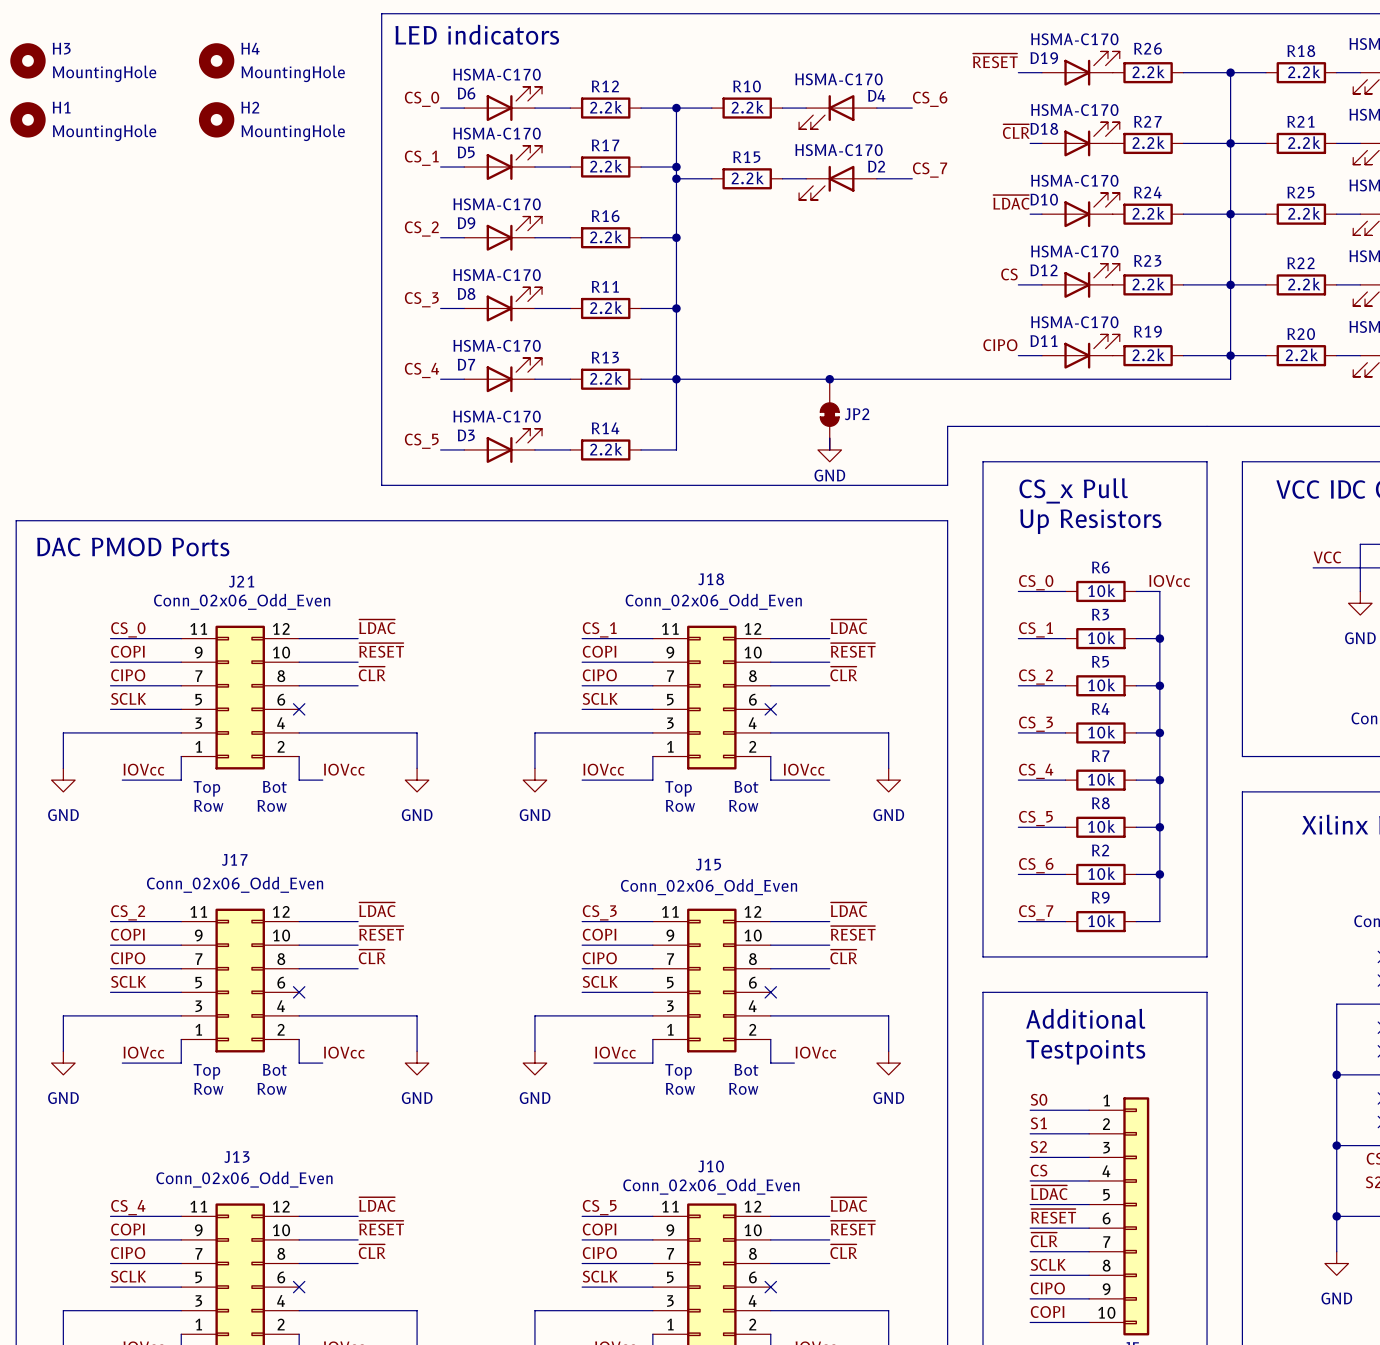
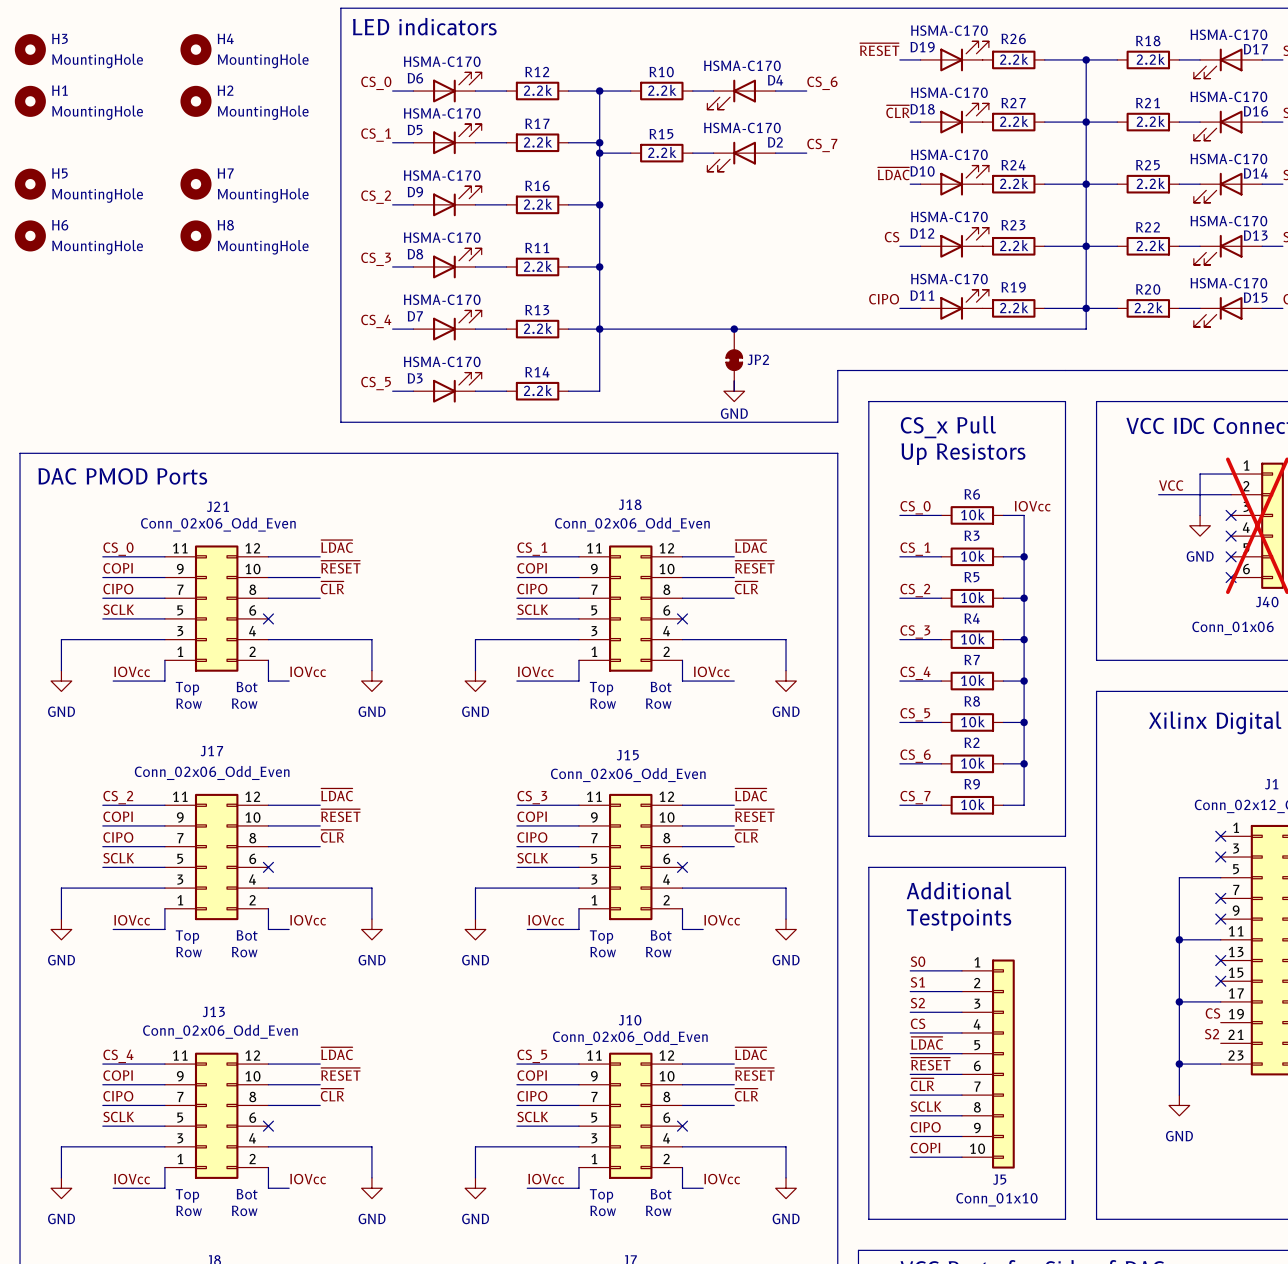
H5: none -> MountingHole (30, 184)
H7: none -> MountingHole (195, 184)
H6: none -> MountingHole (30, 235)
H8: none -> MountingHole (195, 235)

